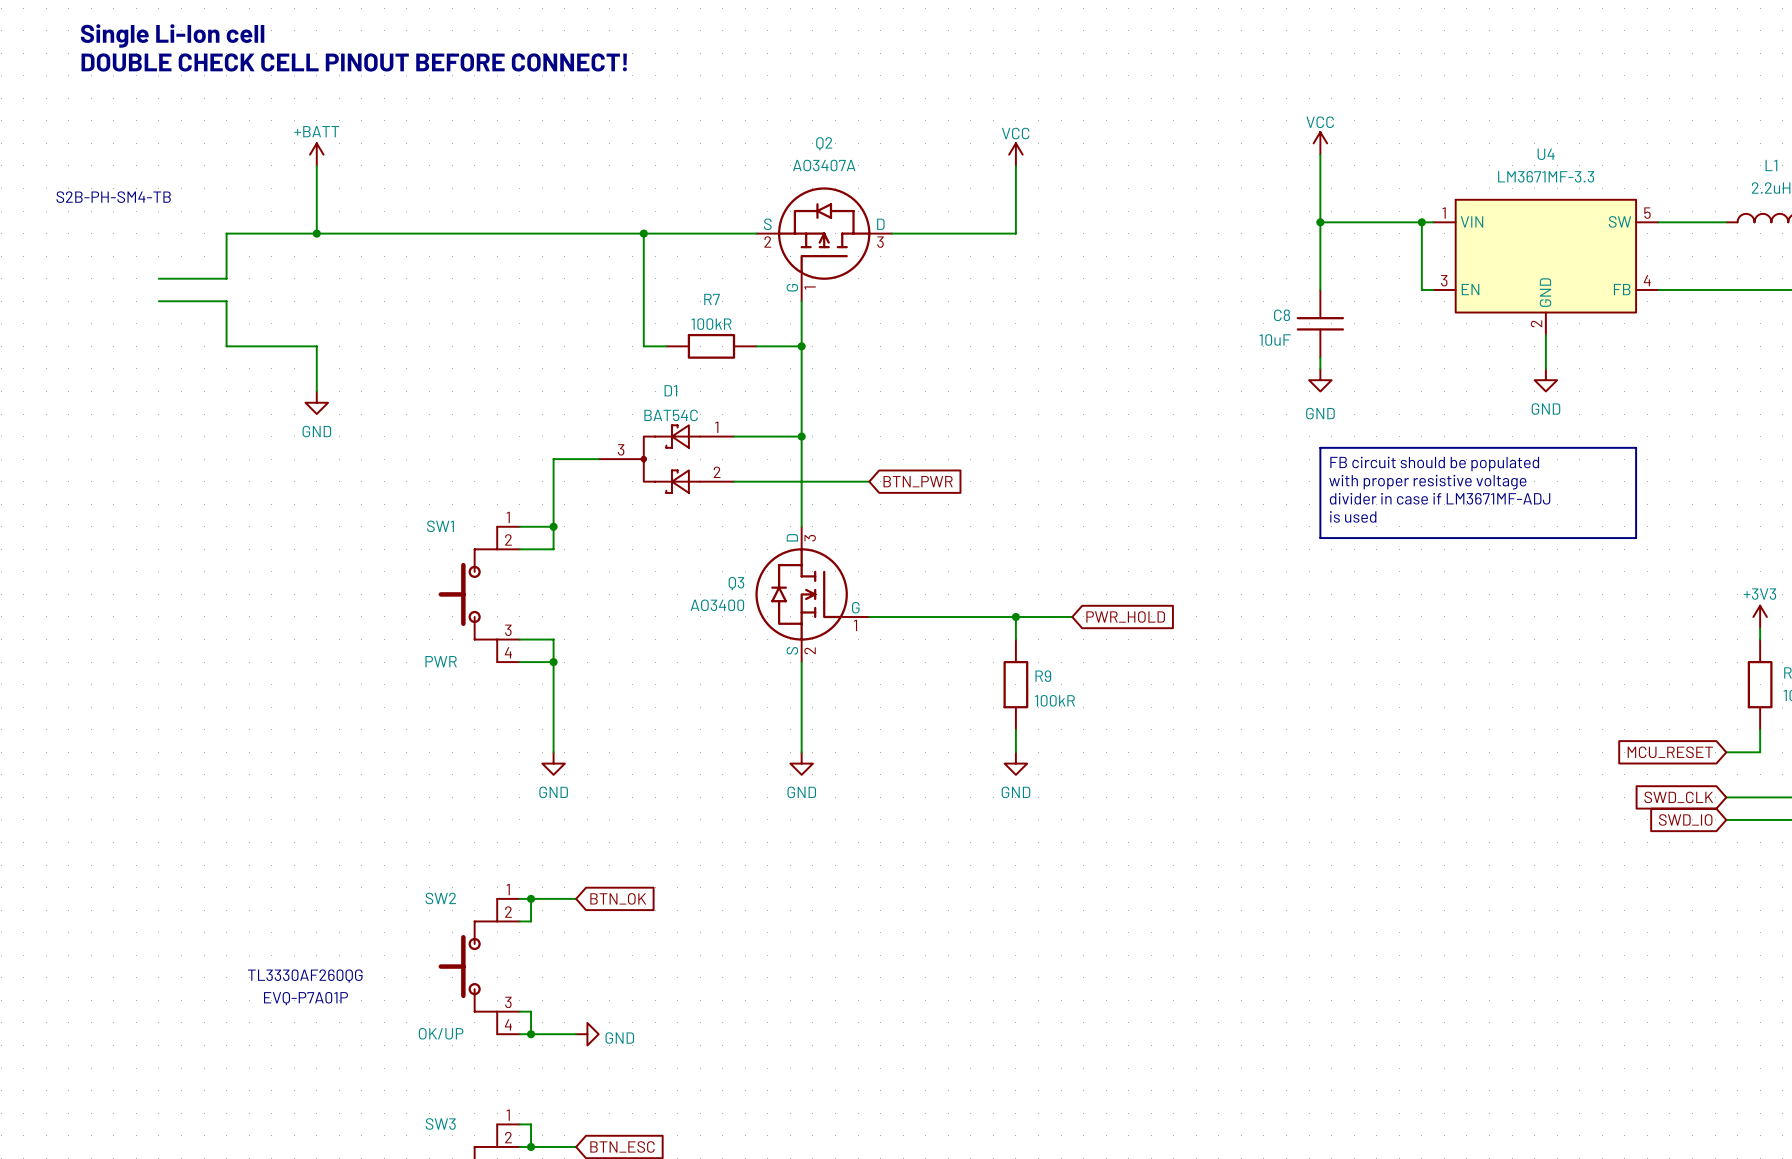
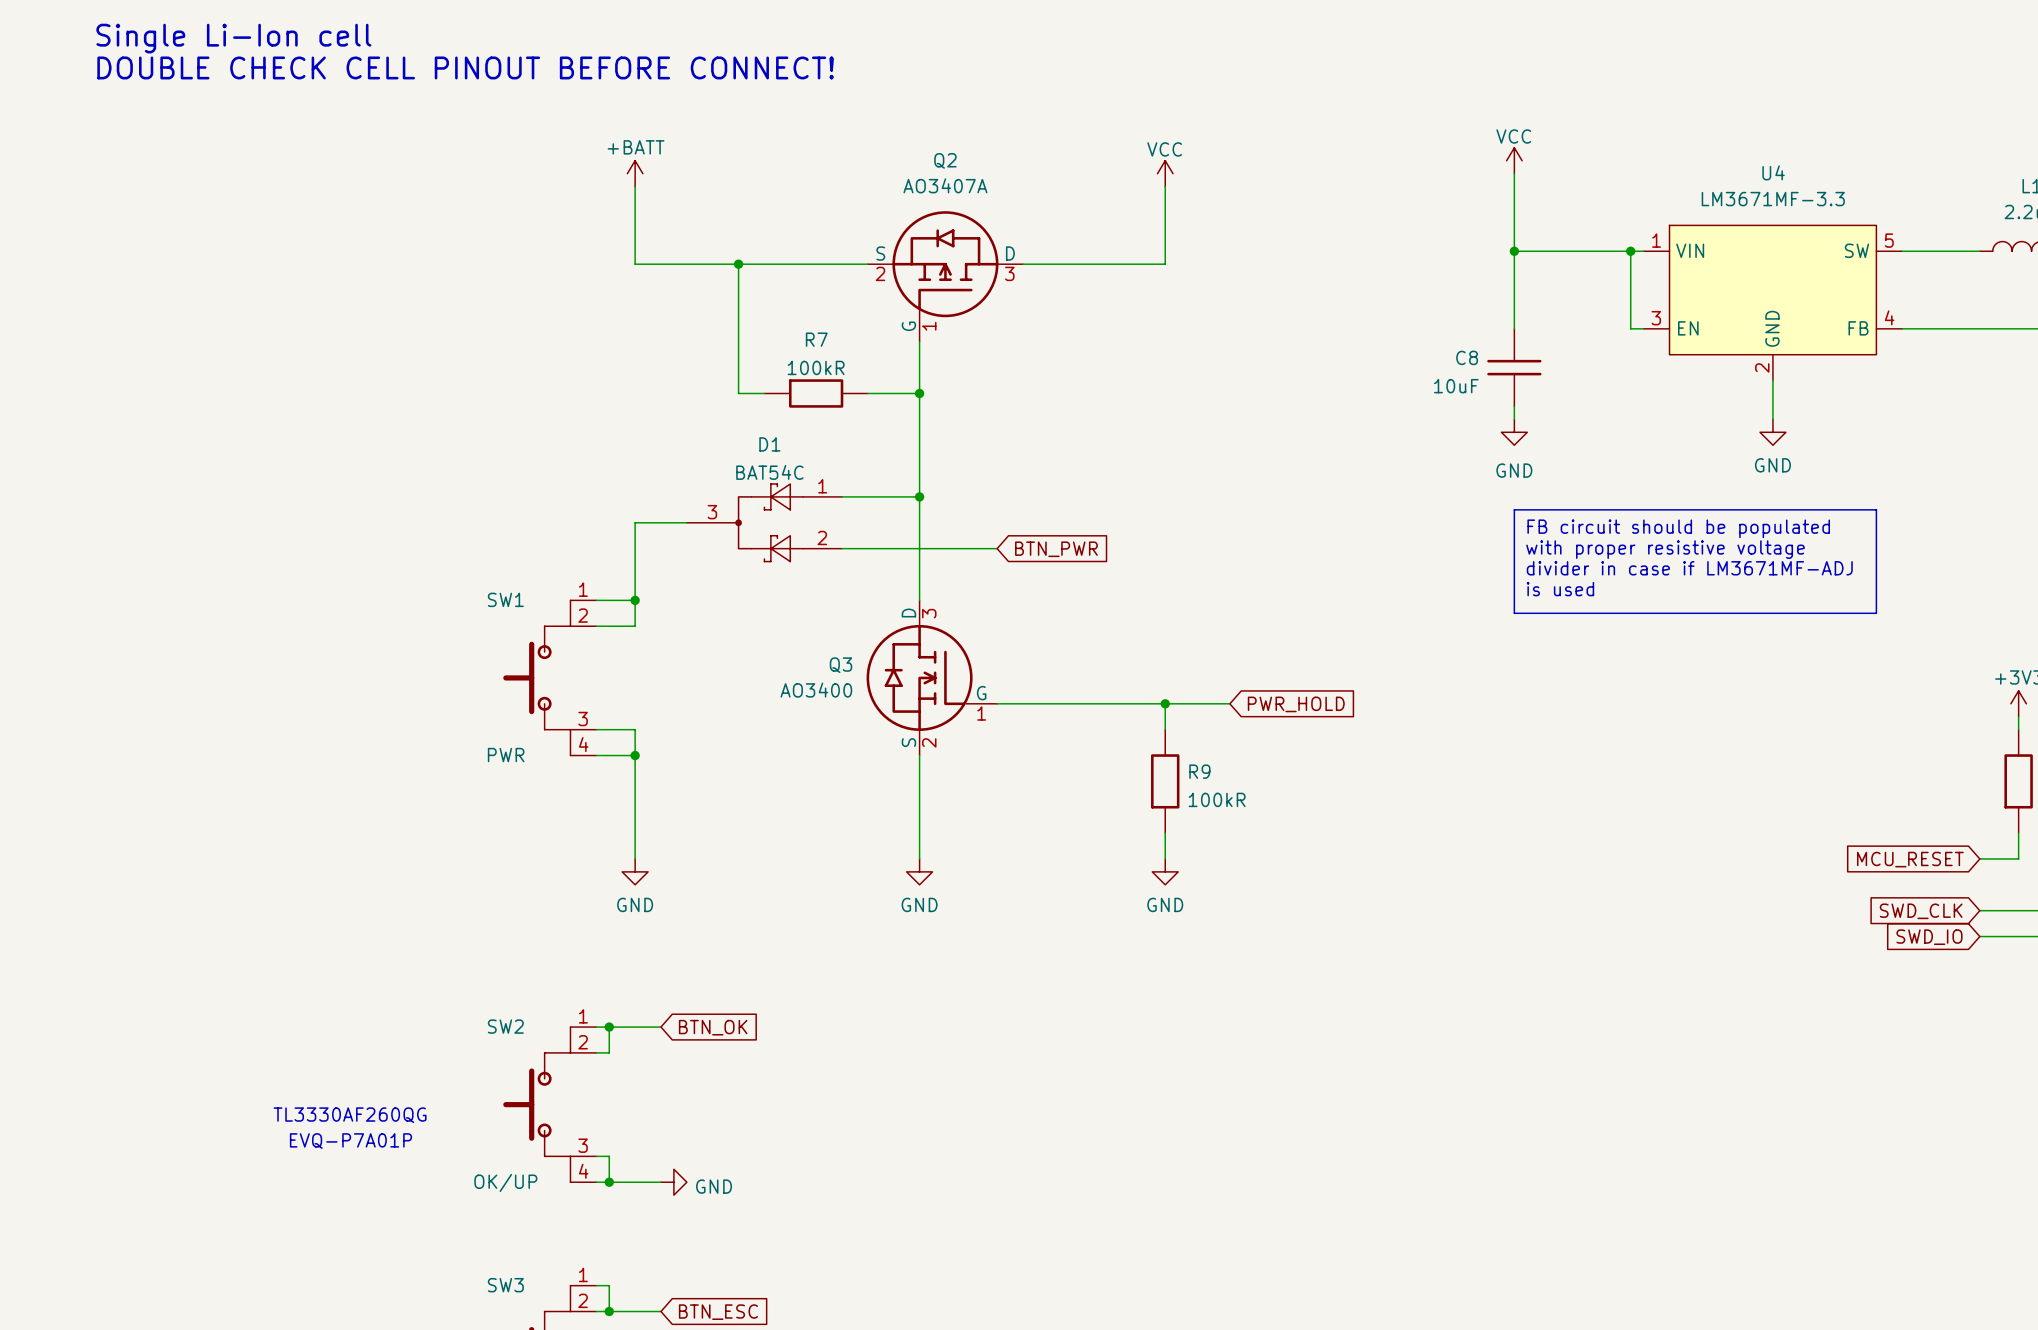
power symbol: +BATT (316, 154) -> none
power symbol: none -> +BATT (635, 173)
wire: (316, 165) (316, 233) -> none
text: S2B-PH-SM4-TB (113, 197) -> none
junction: (316, 233) -> none
wire: (553, 233) (226, 233) (226, 278) (158, 278) -> (635, 264) (635, 186)
wire: (158, 301) (226, 301) (226, 346) (316, 346) (316, 391) -> none
power symbol: GND (316, 402) -> none

